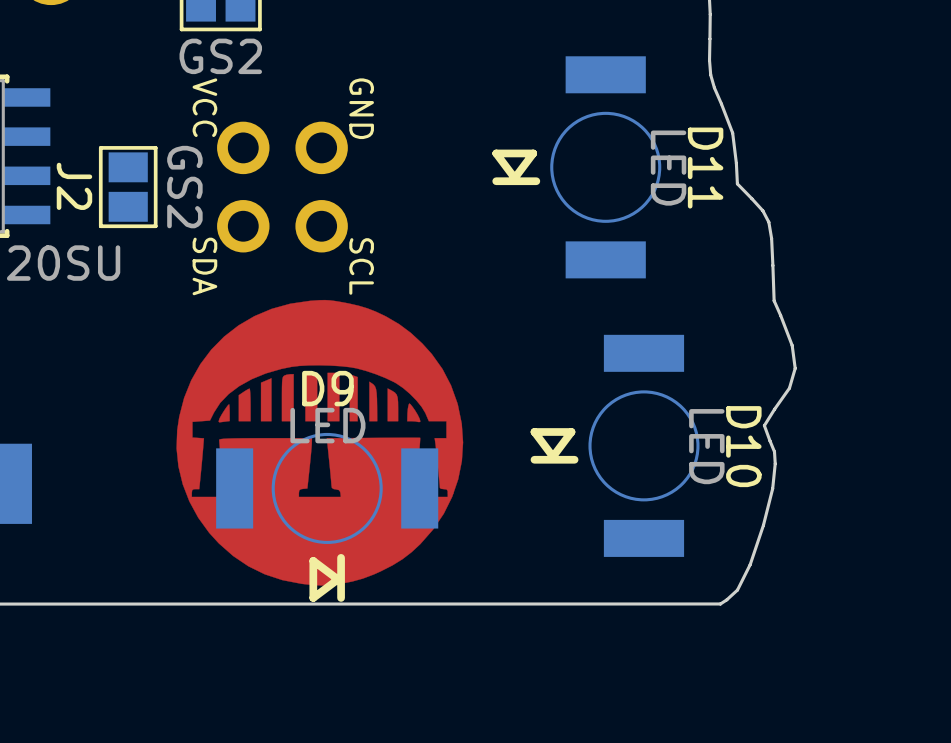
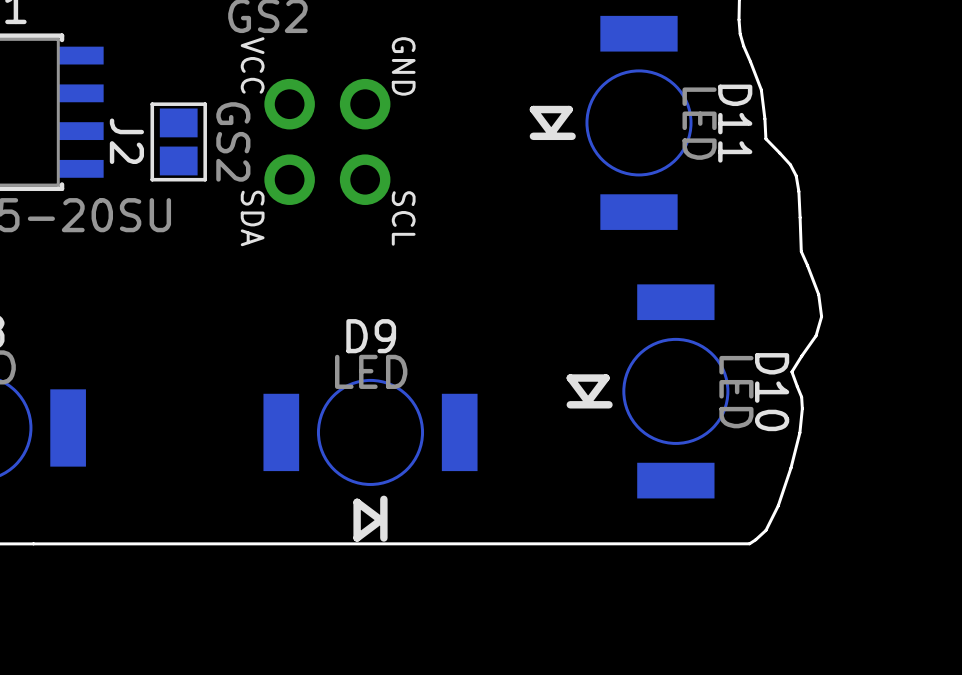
drawing: [176, 299, 464, 586] -> none

